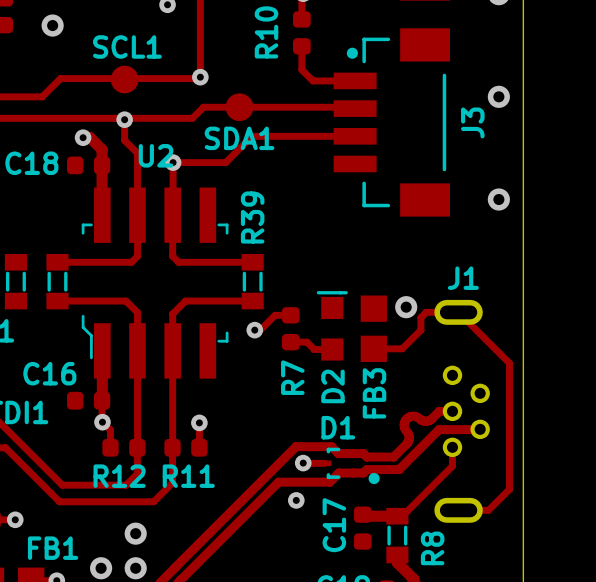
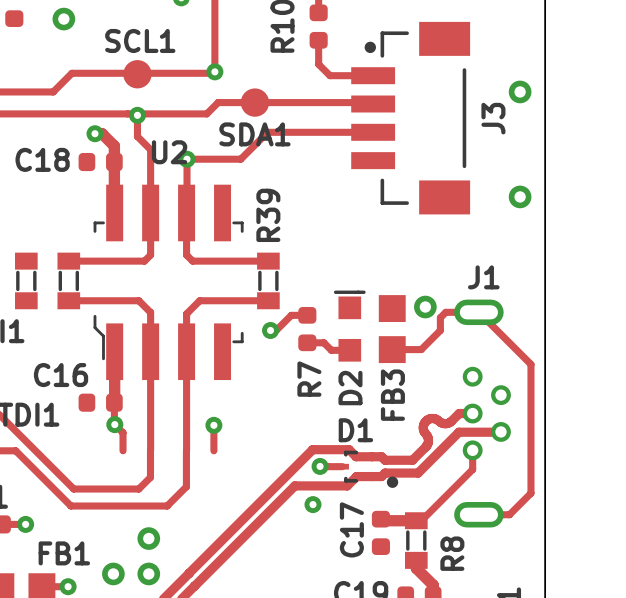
R12: (123, 447) -> none
R11: (185, 447) -> none

